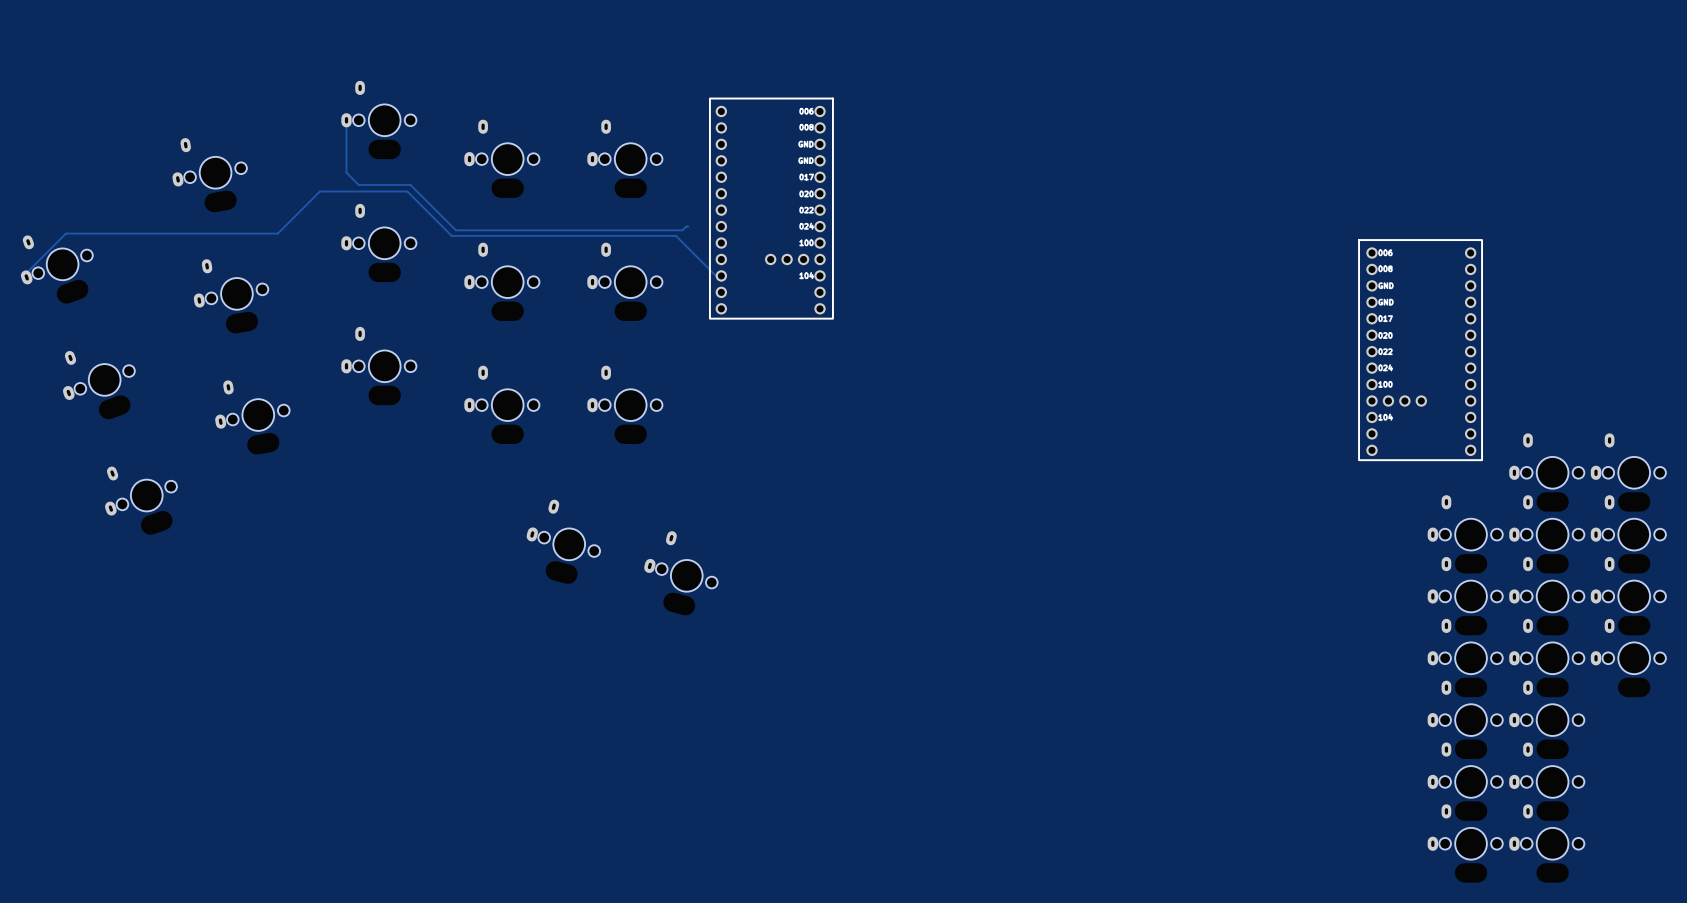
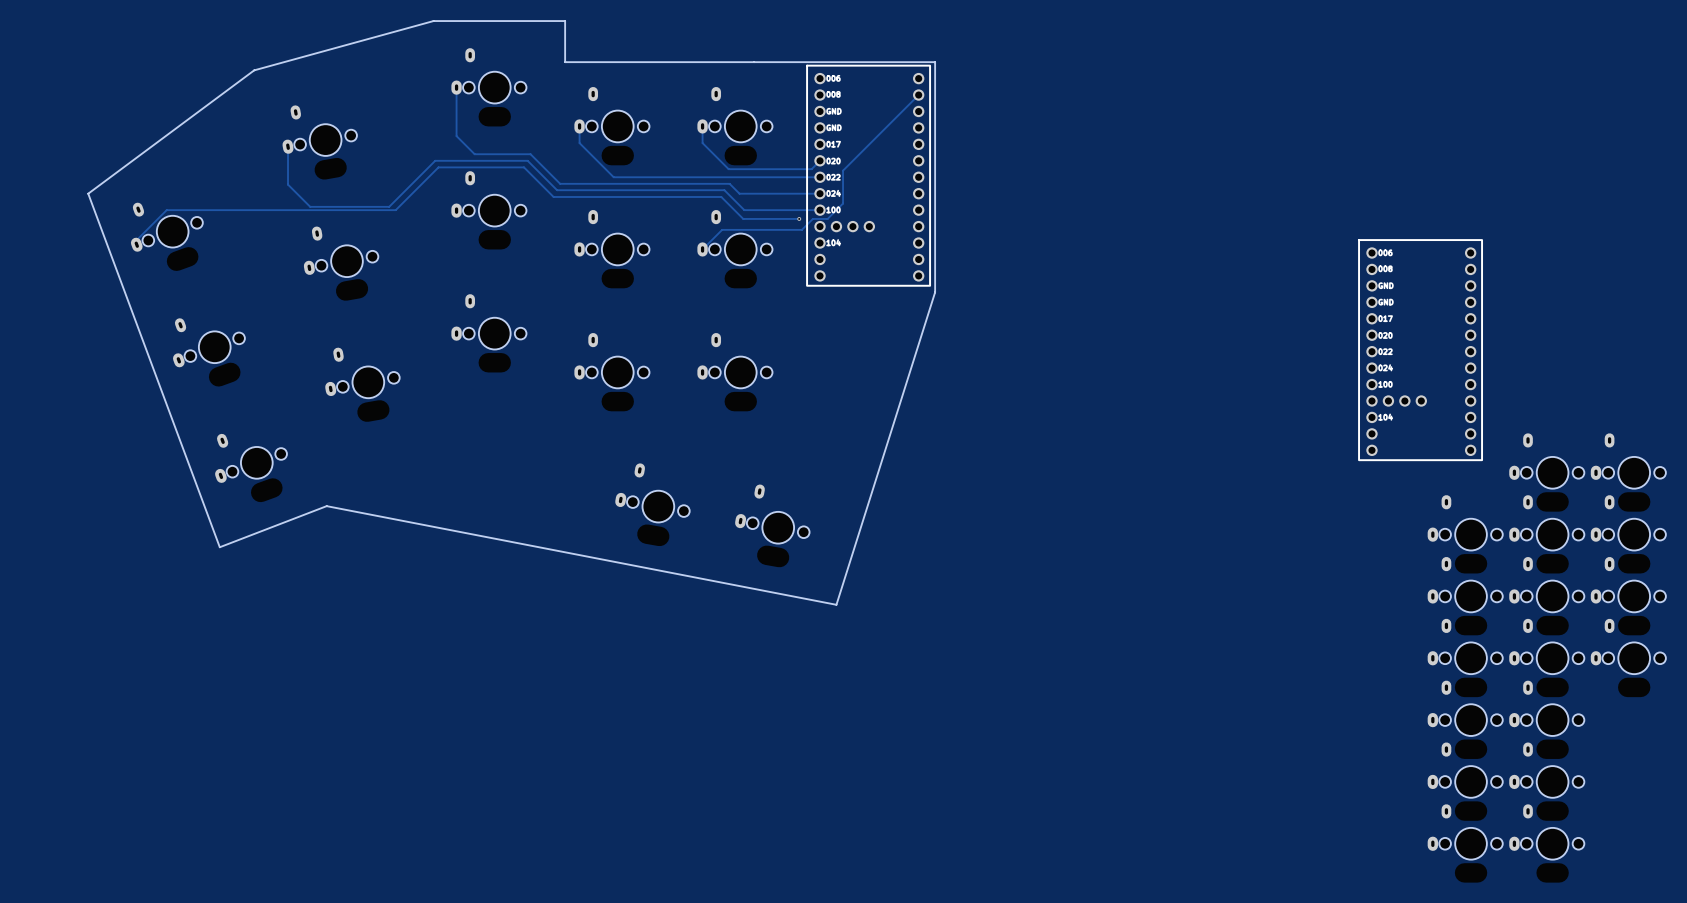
board edge: none -> (433, 21) (254, 70) (88, 193) (219, 547) (326, 506) (836, 604) (935, 292) (935, 62) (565, 62) (565, 21) (433, 21)
track: none -> (456, 87) (456, 136) (474, 154) (530, 154) (560, 183) (729, 183) (739, 193) (820, 193)
part: none -> (488, 87)
track: none -> (918, 95) (843, 170) (843, 203) (827, 218) (812, 218) (801, 229) (722, 229) (702, 249)
part: (378, 119) -> none
track: (346, 120) (346, 172) (358, 185) (410, 185) (455, 230) (682, 230) (688, 226) -> none
track: none -> (579, 126) (579, 143) (613, 177) (820, 177)
track: none -> (702, 126) (702, 143) (728, 169) (811, 169) (820, 160)
part: none -> (734, 126)
part: none -> (319, 142)
track: none -> (288, 146) (288, 184) (310, 206) (389, 206) (435, 160) (527, 160) (557, 190) (724, 190) (744, 210) (820, 210)
part: (501, 158) -> none
part position: (624, 158) -> (611, 126)
part: (209, 175) -> none
part side: bottom (771, 208) -> top (868, 175)
part: none -> (488, 210)
track: none -> (799, 218) (743, 218) (721, 196) (553, 196) (524, 167) (438, 167) (395, 210) (166, 210) (136, 240) (136, 244)
via: none -> (799, 218)
part: none -> (166, 236)
part: (378, 242) -> none
part: none -> (734, 249)
part: none -> (341, 263)
part: (56, 269) -> none
track: (26, 277) (26, 272) (65, 233) (277, 233) (319, 191) (407, 191) (451, 235) (676, 235) (721, 281) -> none
part: (501, 281) -> none
part position: (624, 281) -> (611, 249)
part: (231, 296) -> none
part: none -> (488, 333)
part: none -> (208, 352)
part: (378, 365) -> none
part: none -> (734, 372)
part: none -> (362, 384)
part: (98, 385) -> none
part: (501, 404) -> none
part position: (624, 404) -> (611, 372)
part: (252, 417) -> none
part: none -> (251, 467)
part: (140, 500) -> none
part: none -> (652, 504)
part: none -> (772, 525)
part: (563, 541) -> none
part: (680, 573) -> none

